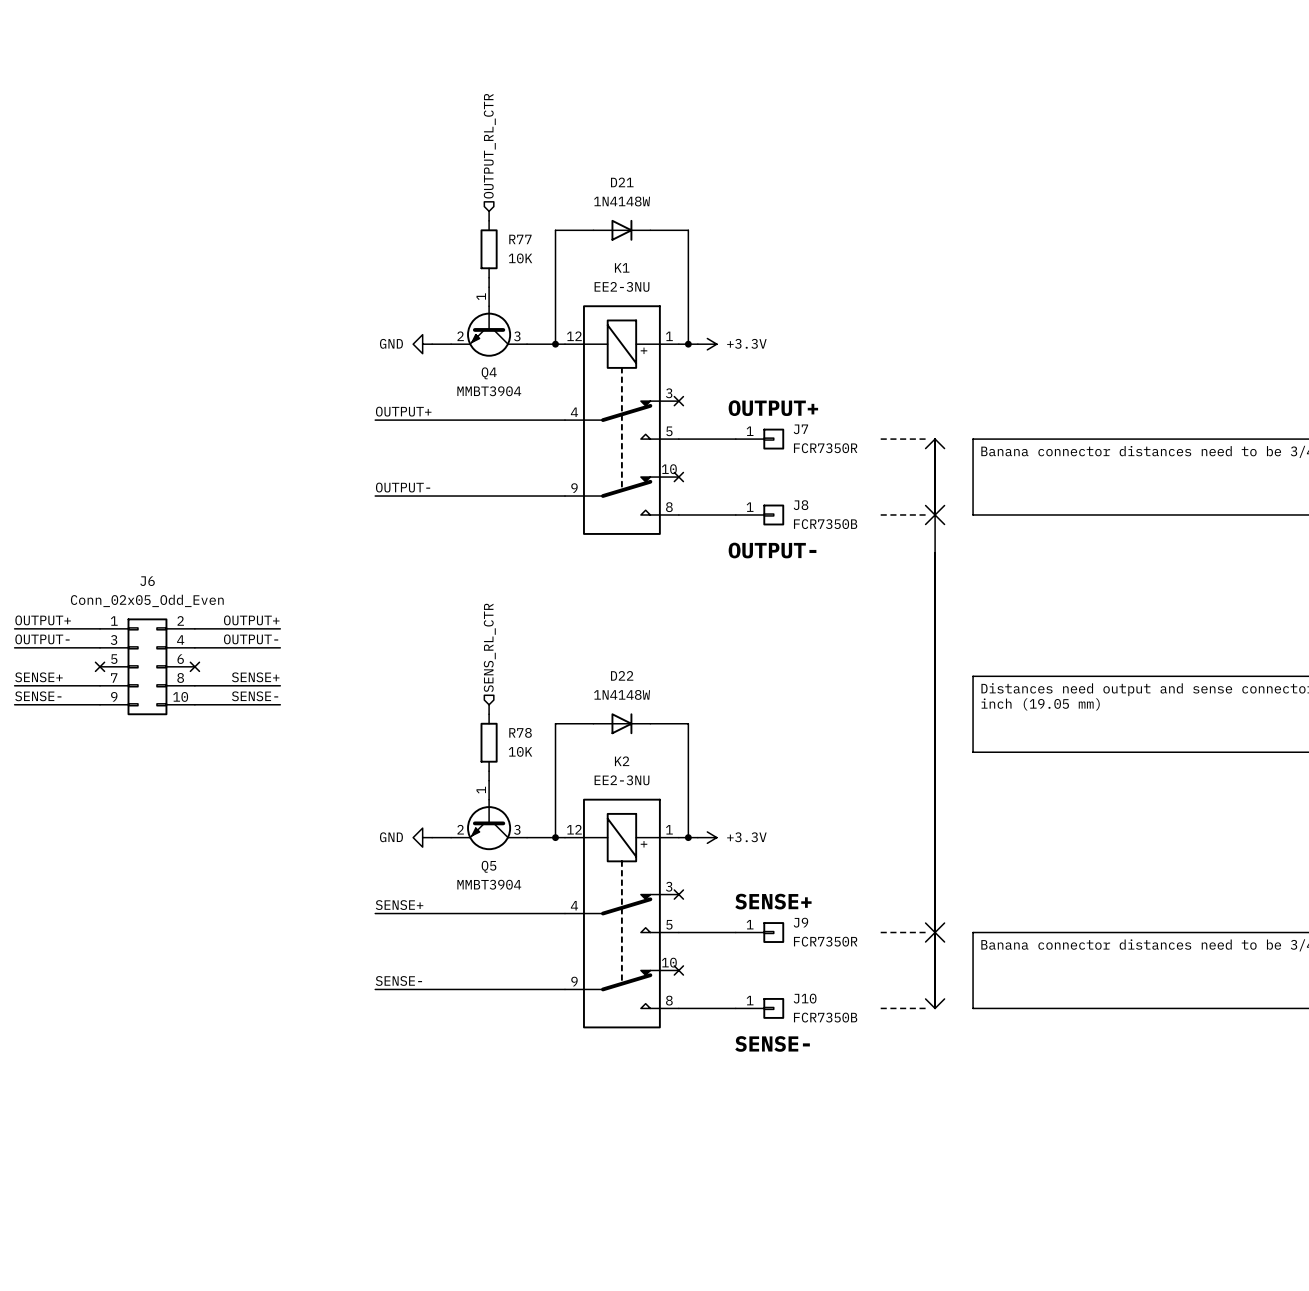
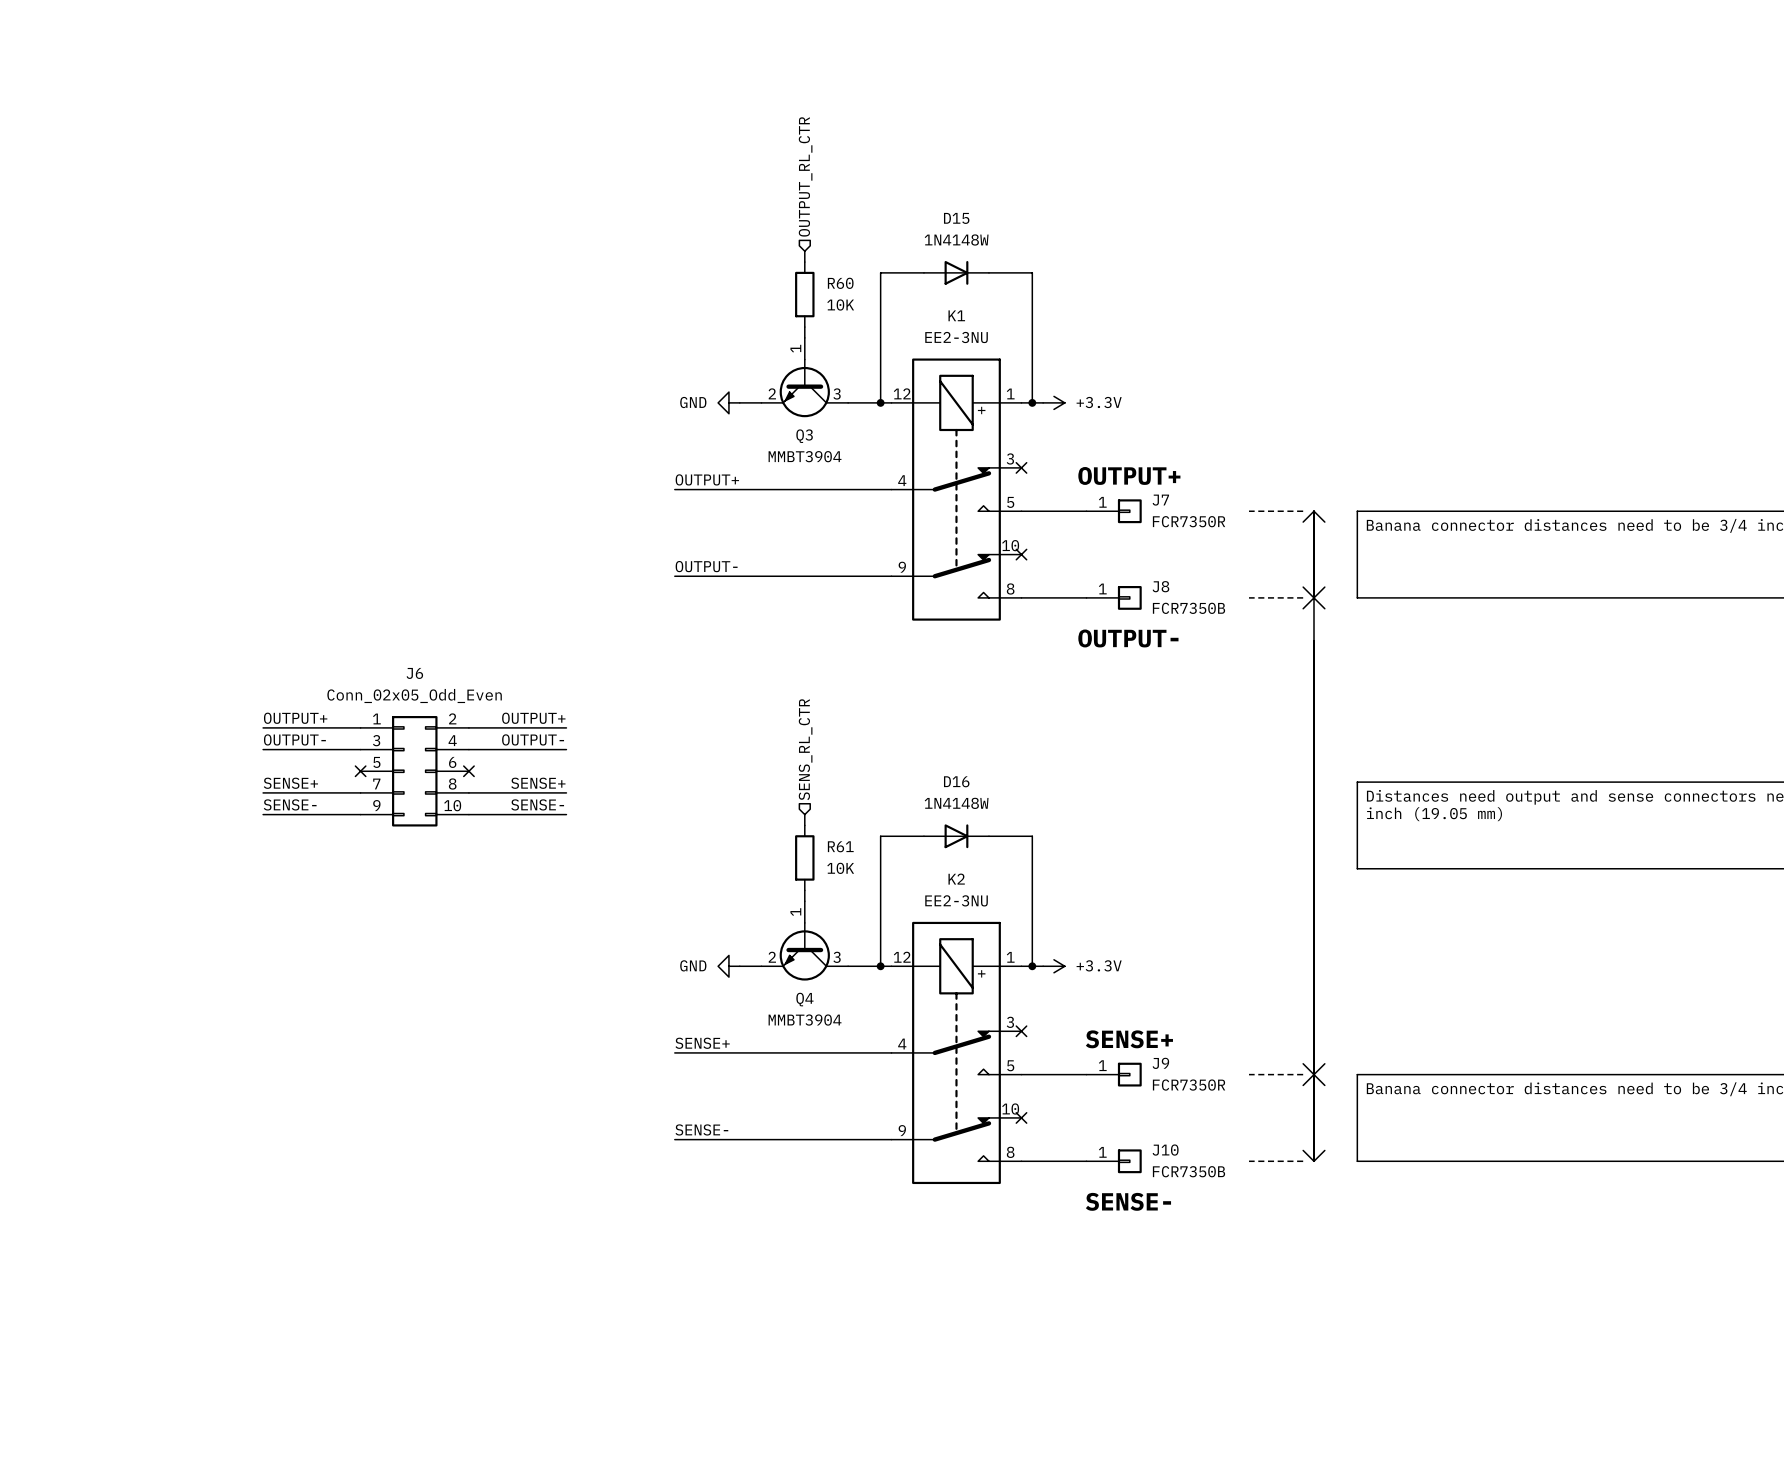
D21 name: D21 (622, 182) -> D15 (956, 218)
R77 name: R77 (520, 239) -> R60 (840, 283)
Q4 name: Q4 (489, 373) -> Q3 (804, 436)
D22 name: D22 (622, 675) -> D16 (956, 781)
R78 name: R78 (520, 732) -> R61 (840, 846)
Q5 name: Q5 (489, 866) -> Q4 (804, 999)

